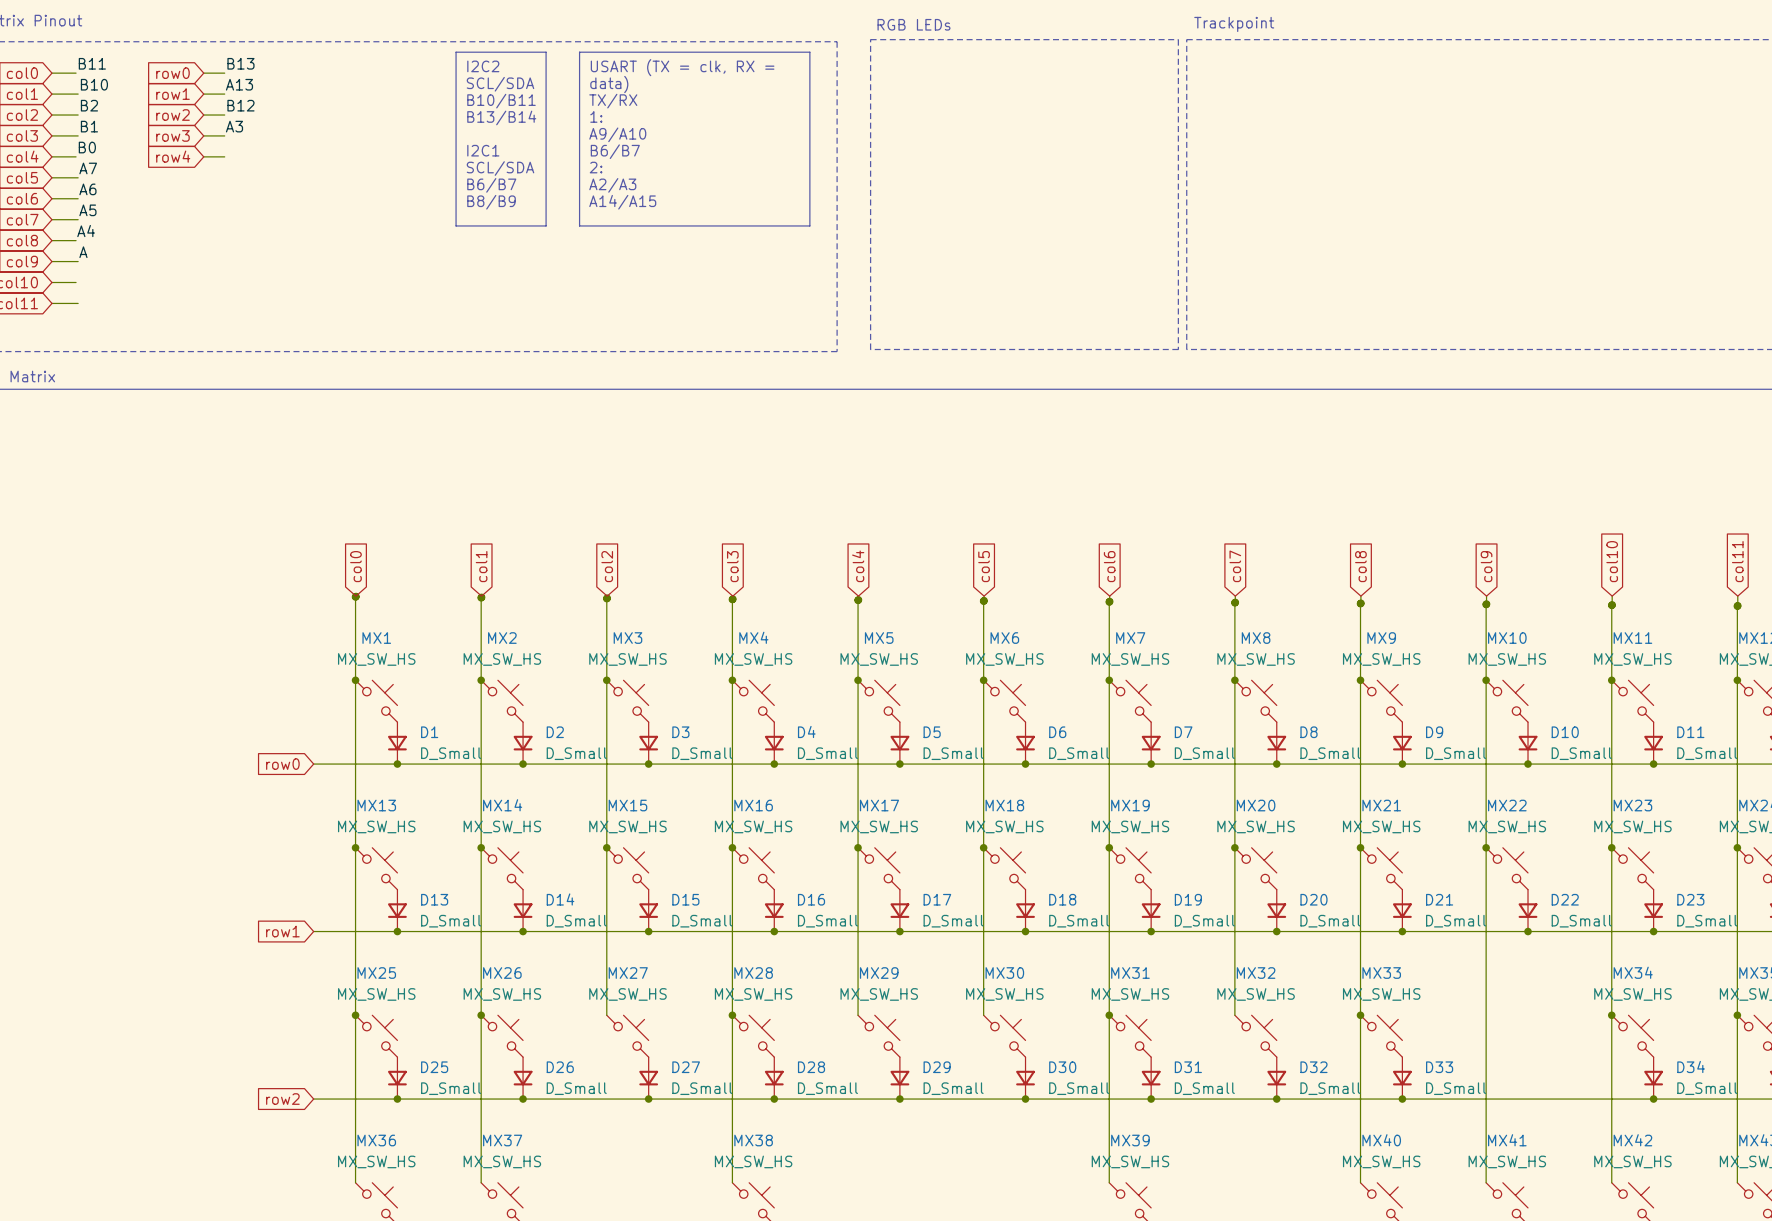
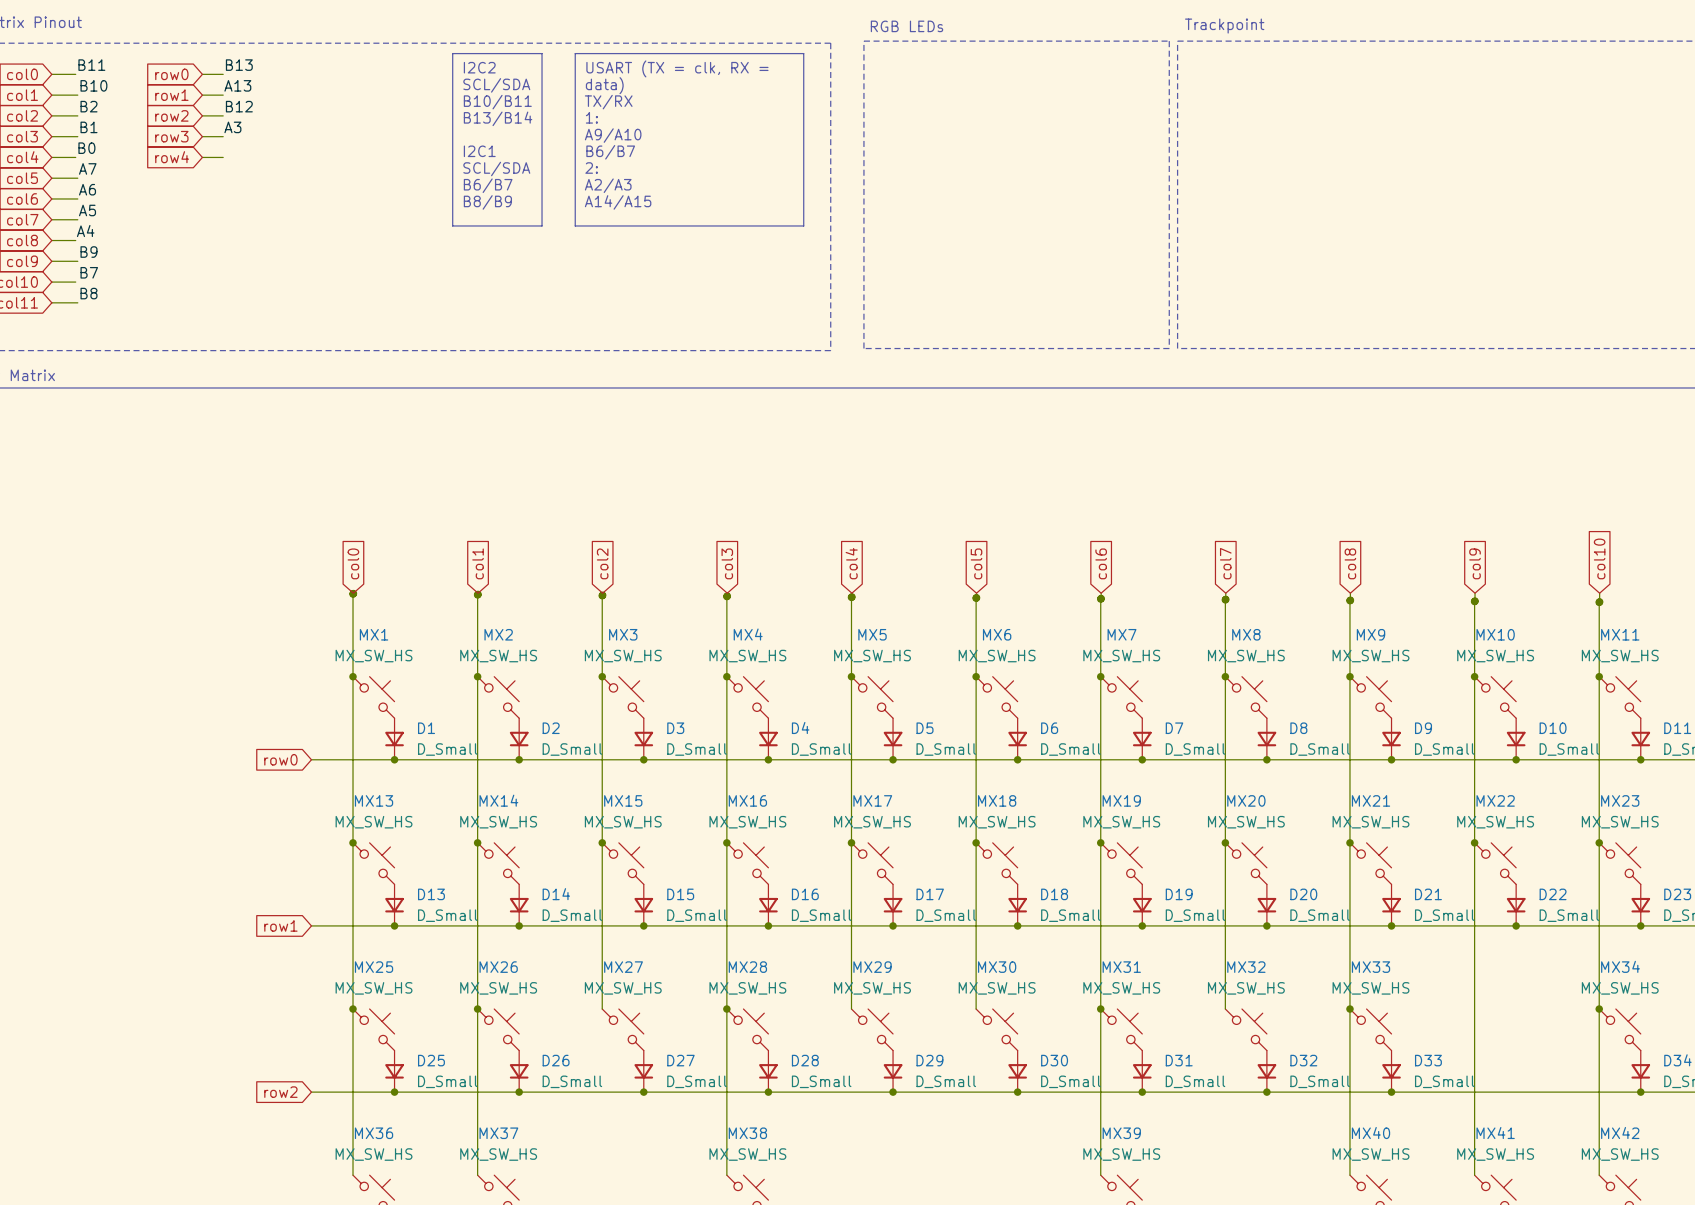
label: A (83, 252) -> B9 (89, 252)
label: none -> B7 (89, 272)
label: none -> B8 (89, 293)

